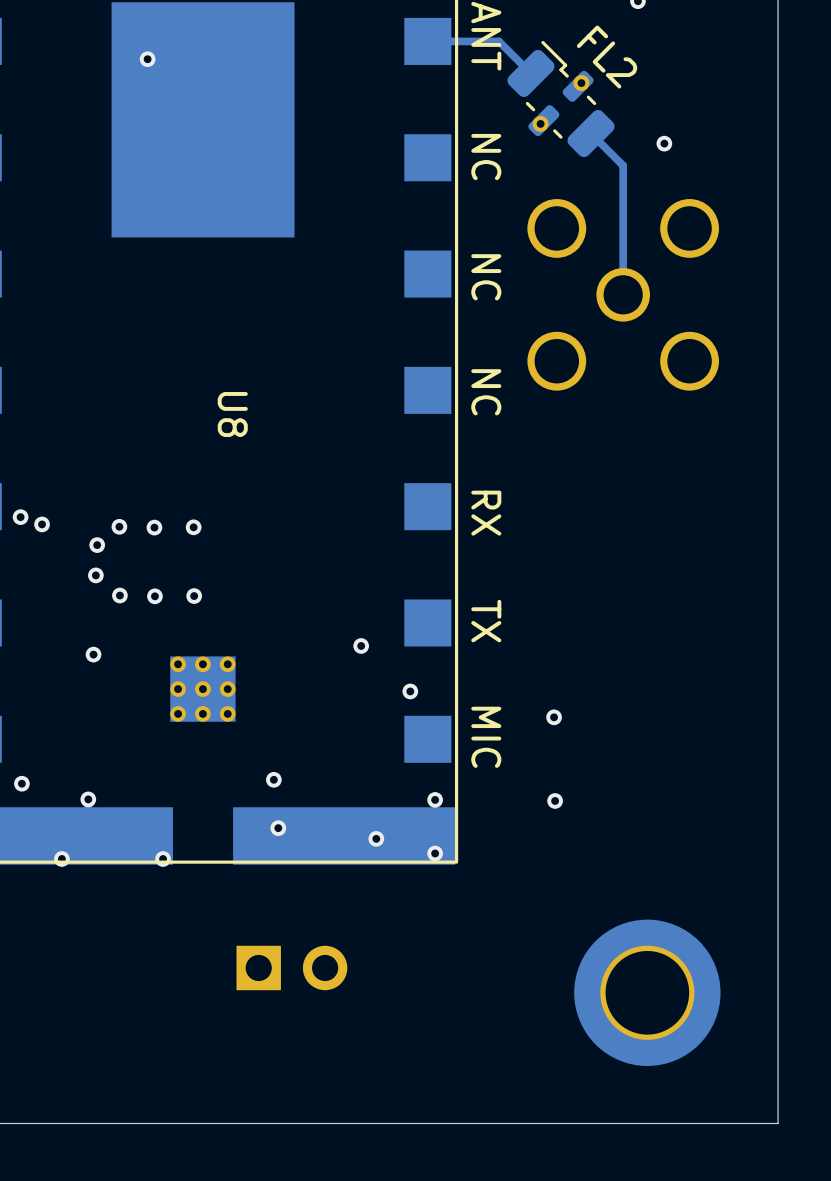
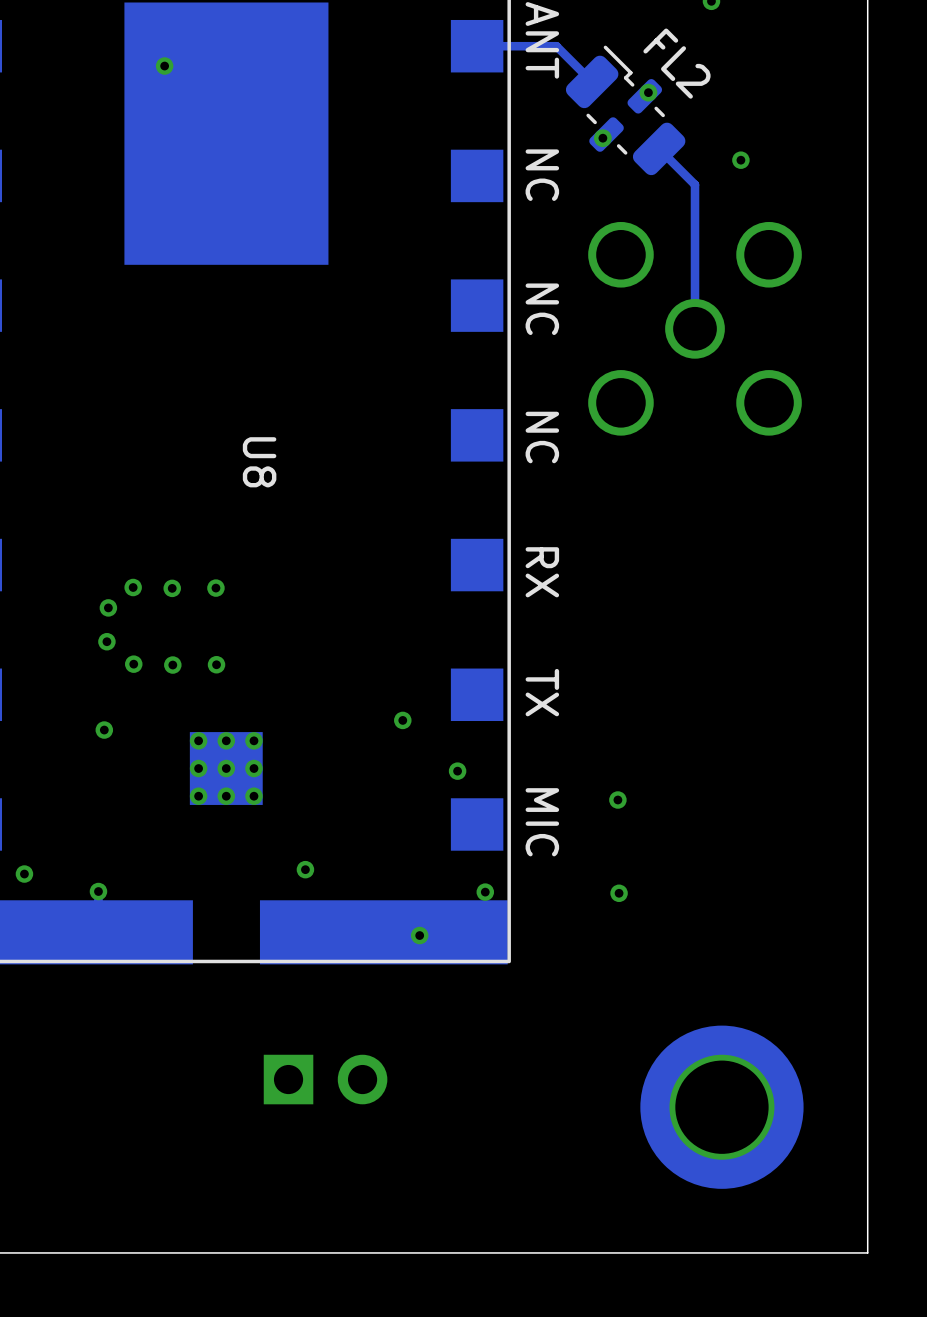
via: (20, 517) -> none
via: (42, 524) -> none
via: (278, 828) -> none
via: (435, 853) -> none
via: (61, 858) -> none
via: (163, 858) -> none

